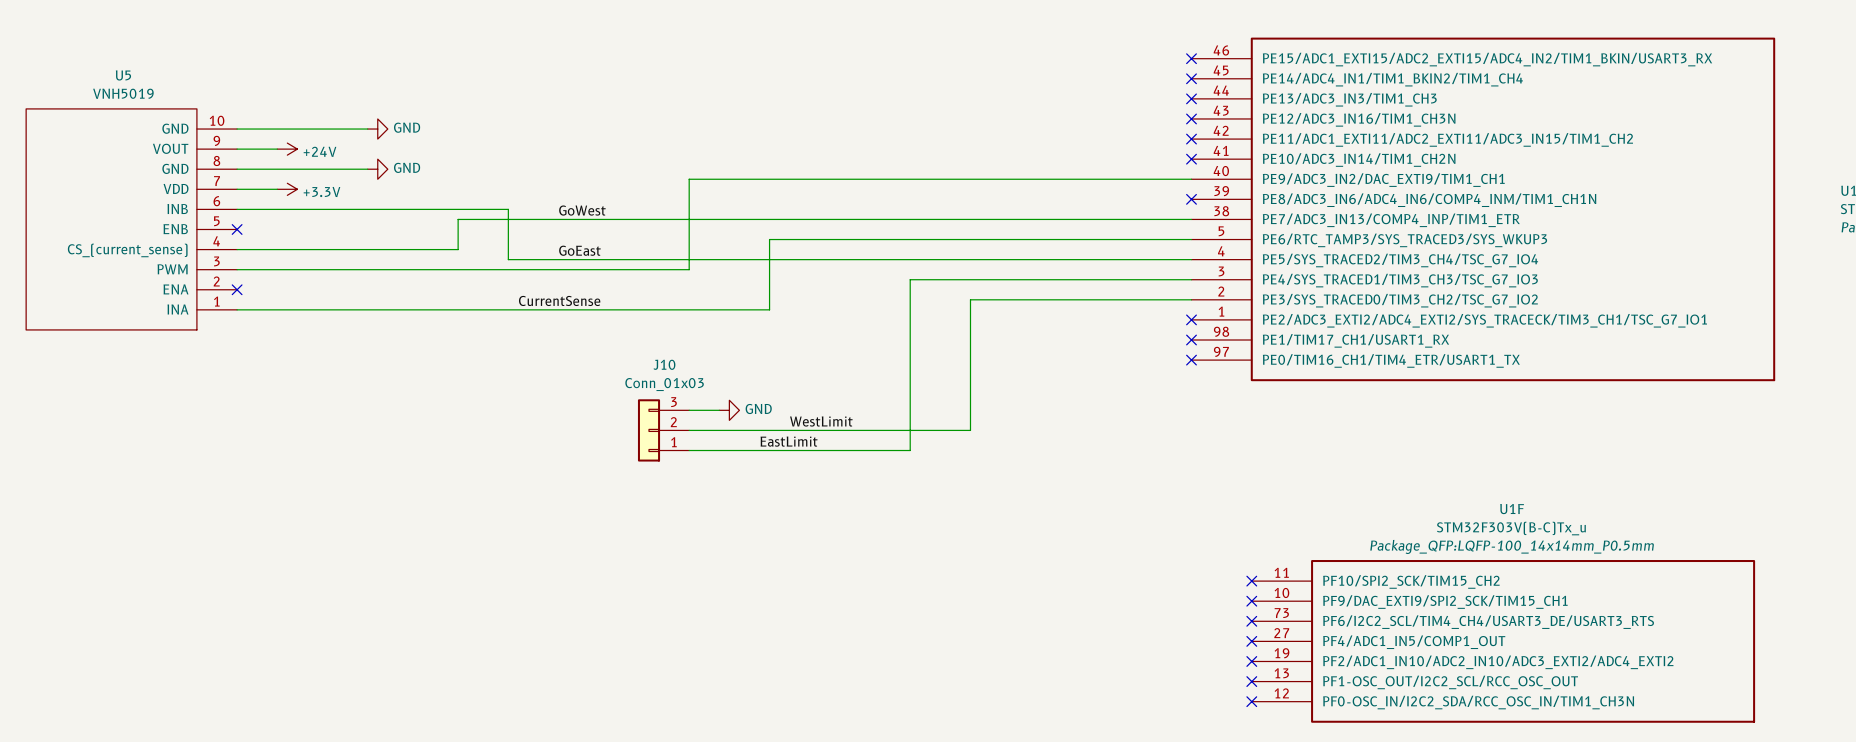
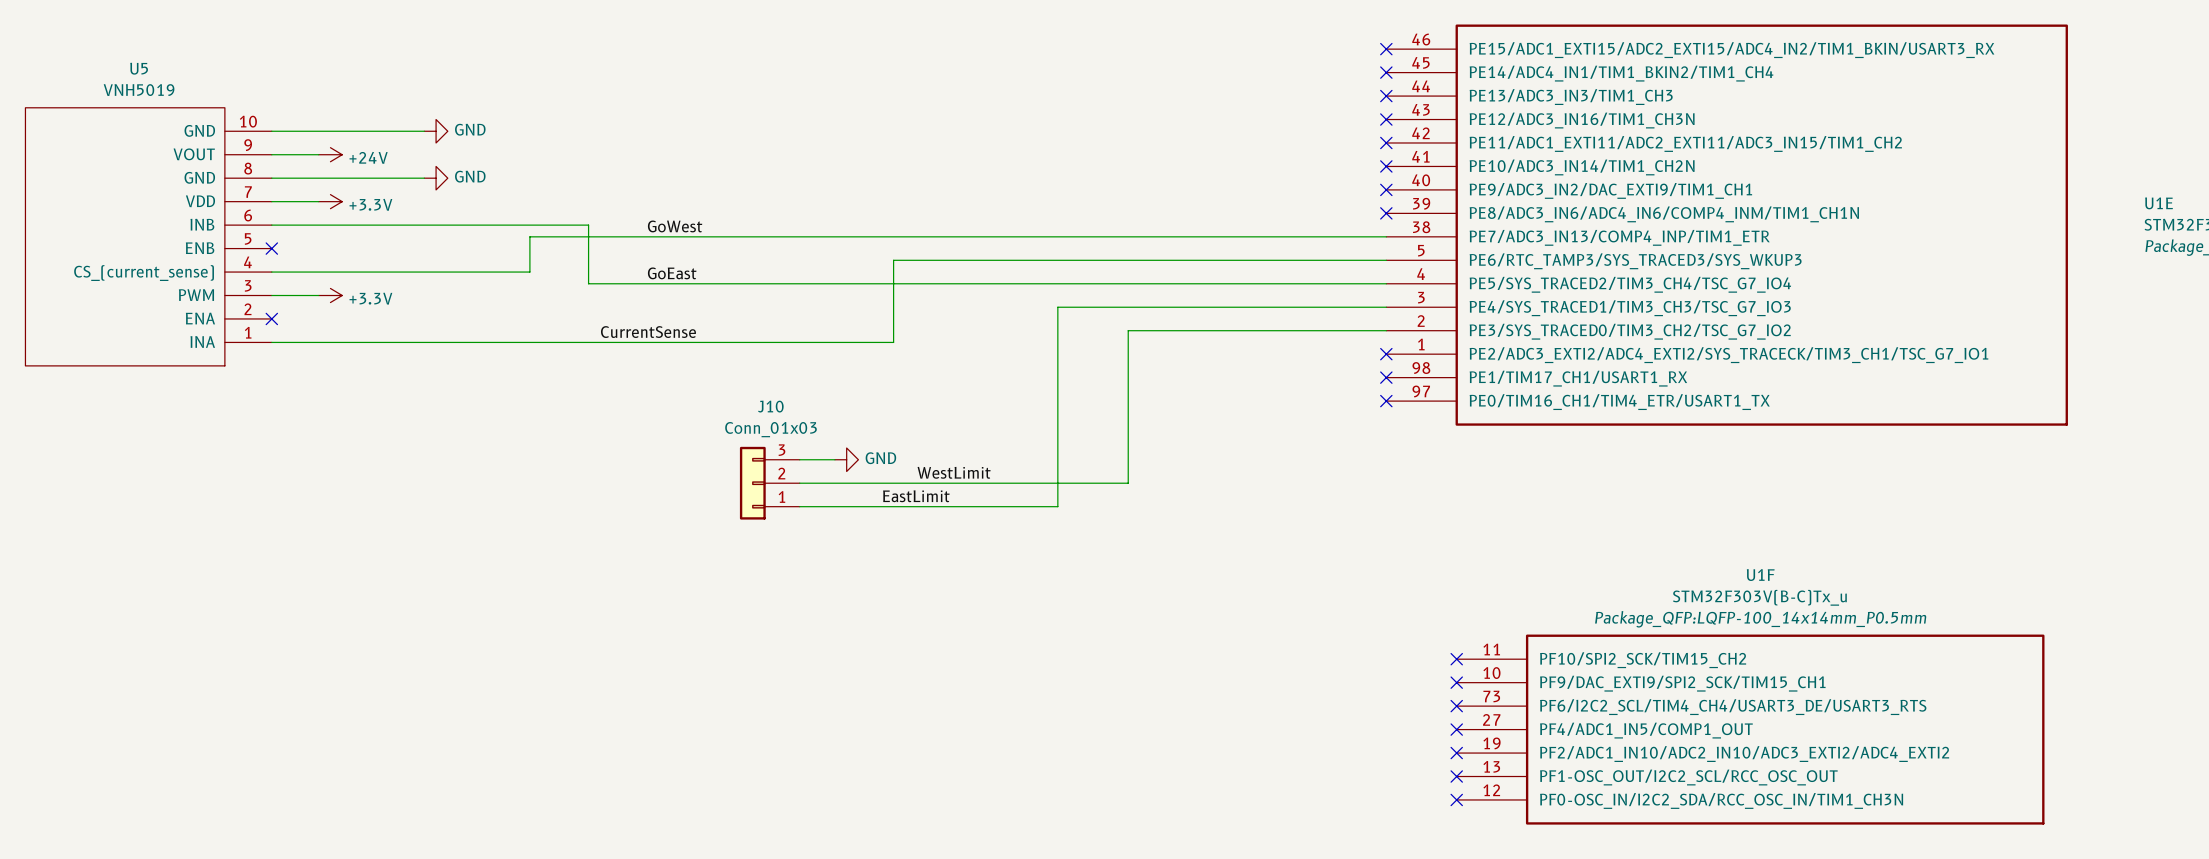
wire: (1191, 179) (689, 179) (689, 269) (277, 269) -> none
no-connect mark: none -> (1386, 189)
power symbol: none -> +3.3V (330, 295)

